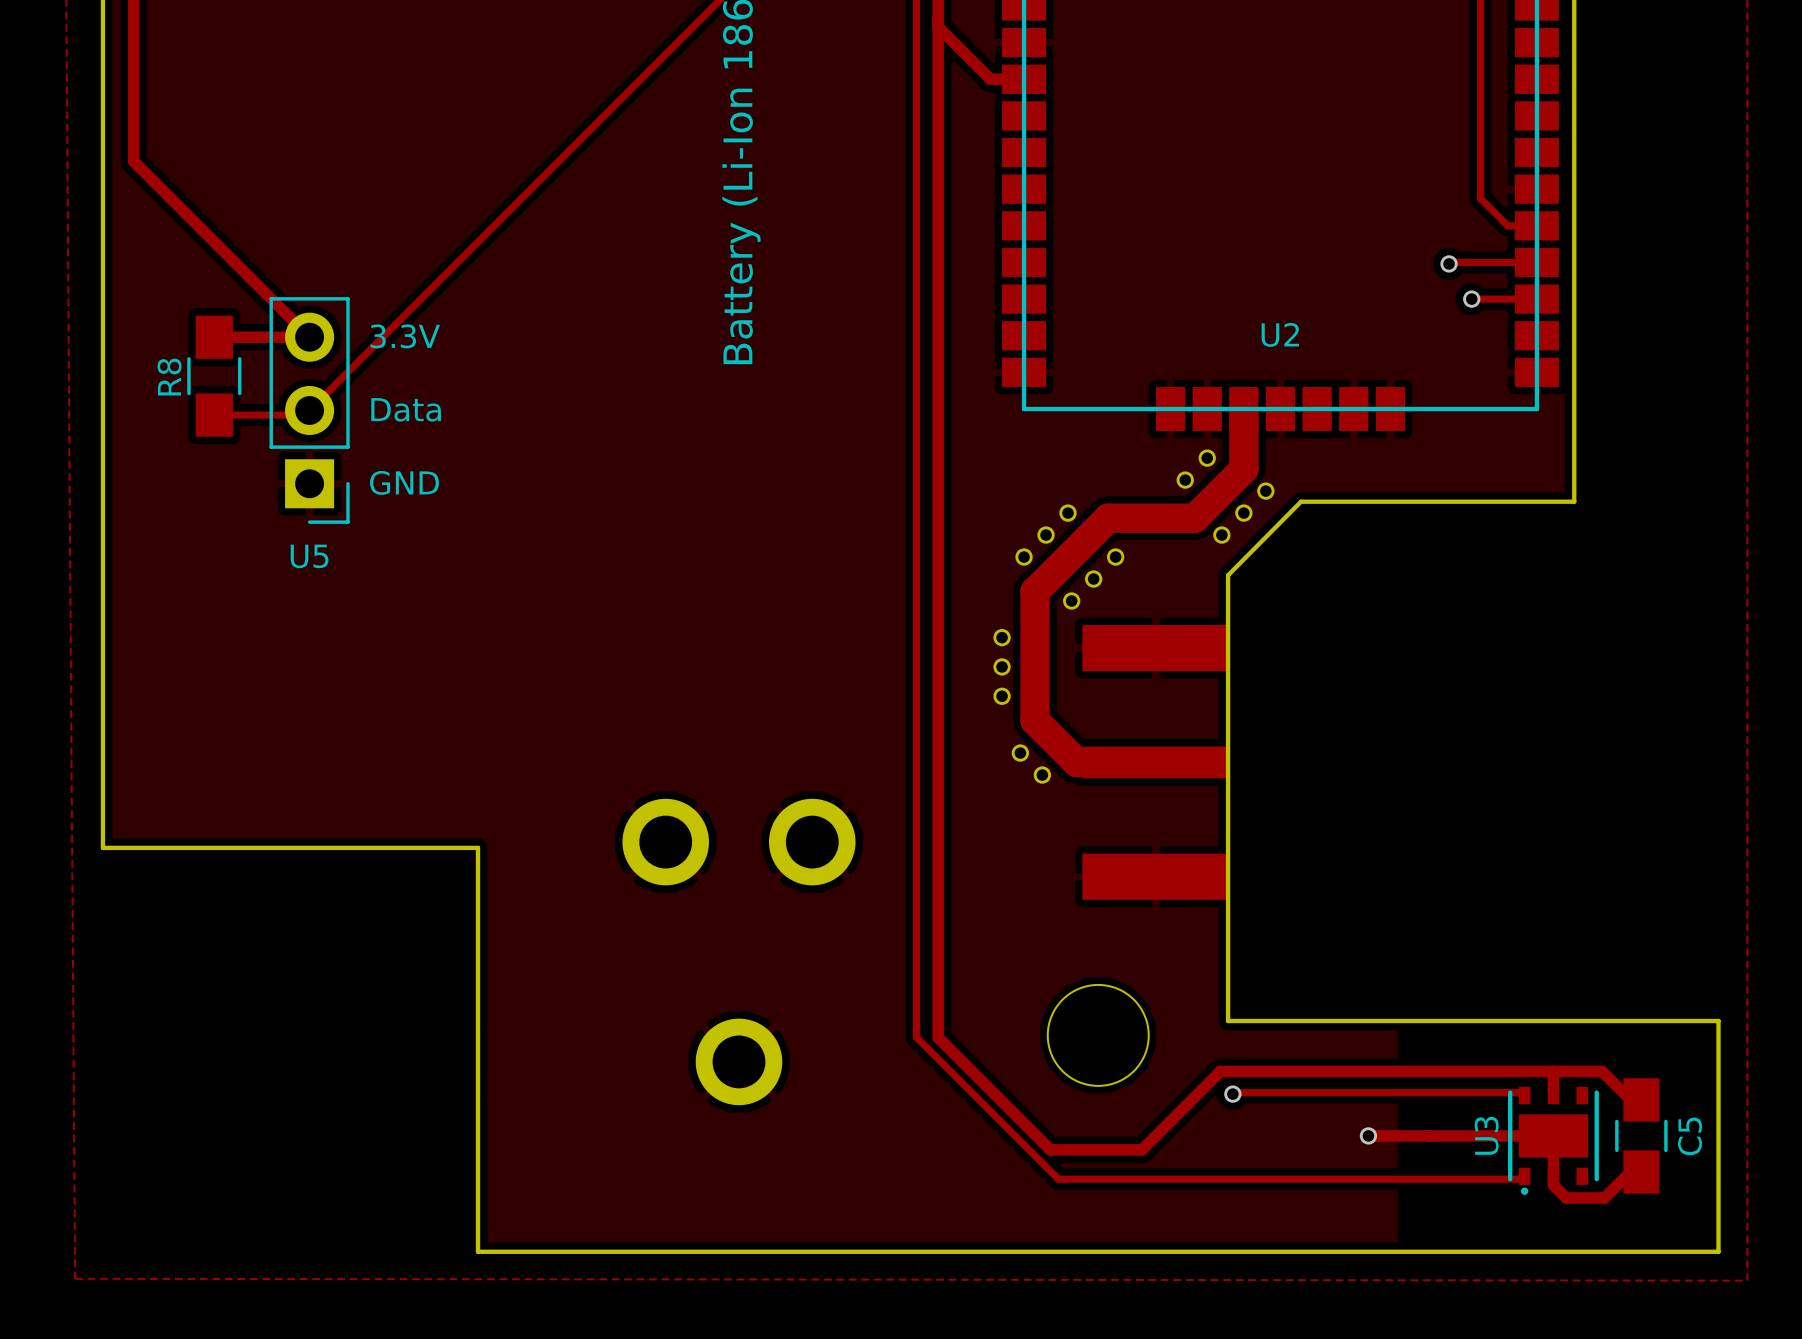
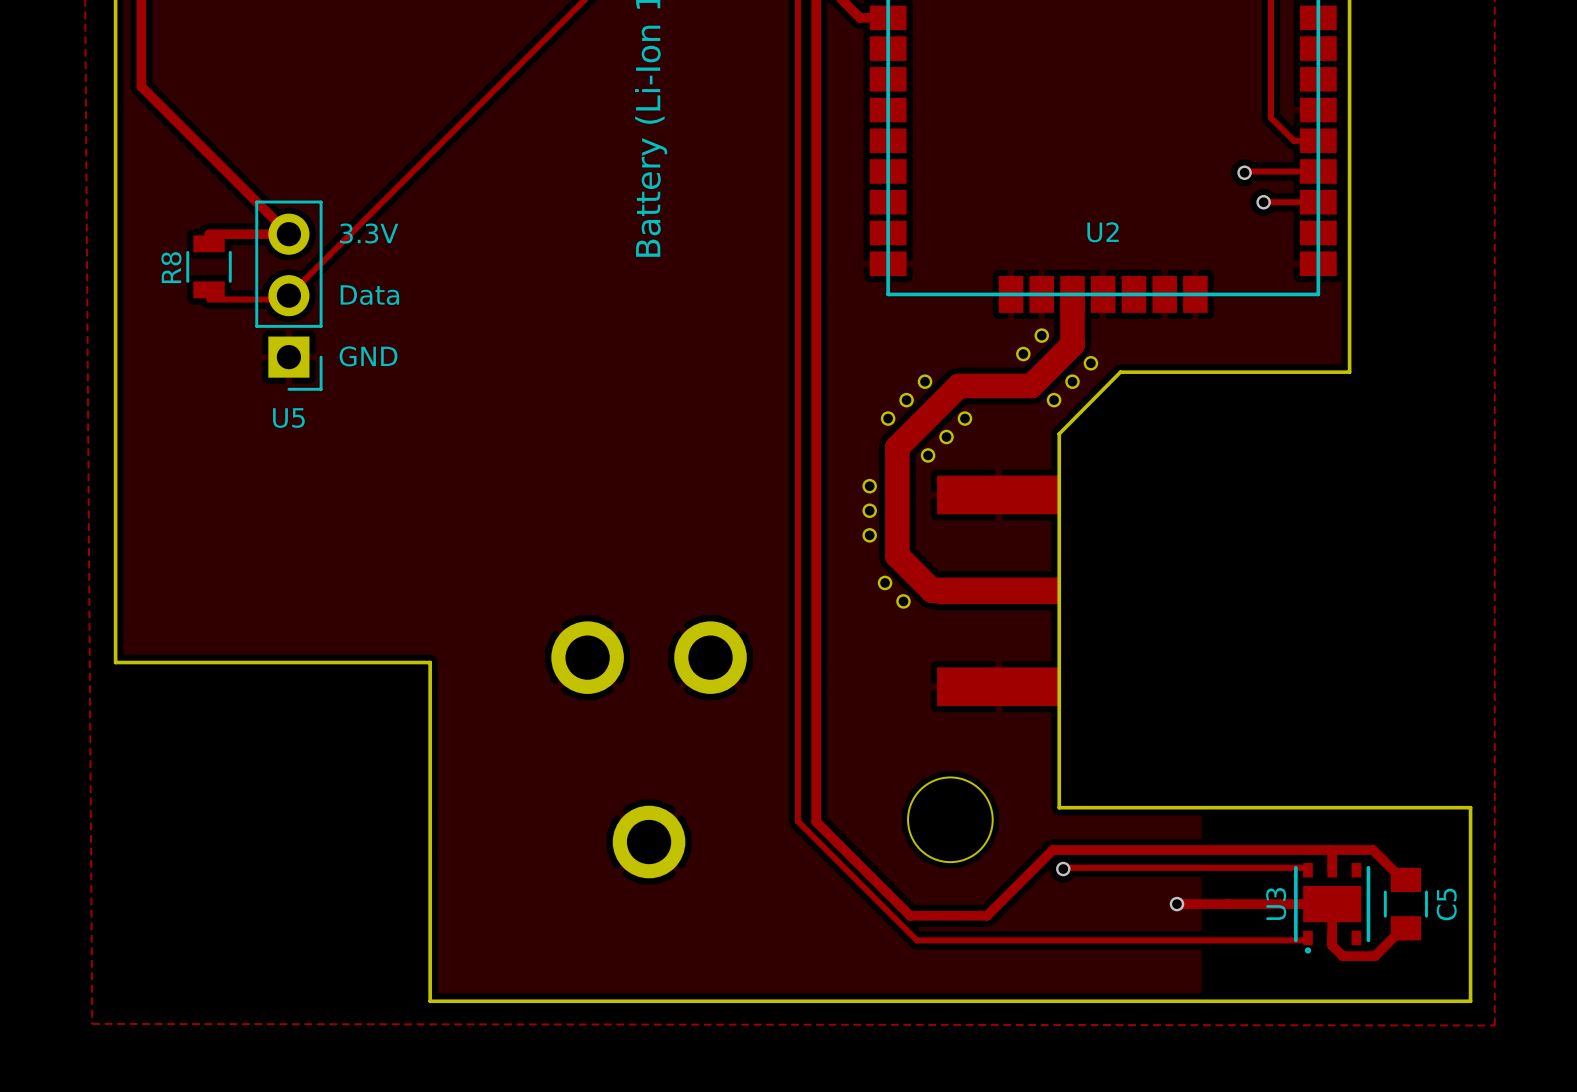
R8 footprint: [187, 315, 242, 437] -> [186, 235, 232, 299]
C5 footprint: [1615, 1078, 1668, 1194] -> [1383, 867, 1428, 941]

